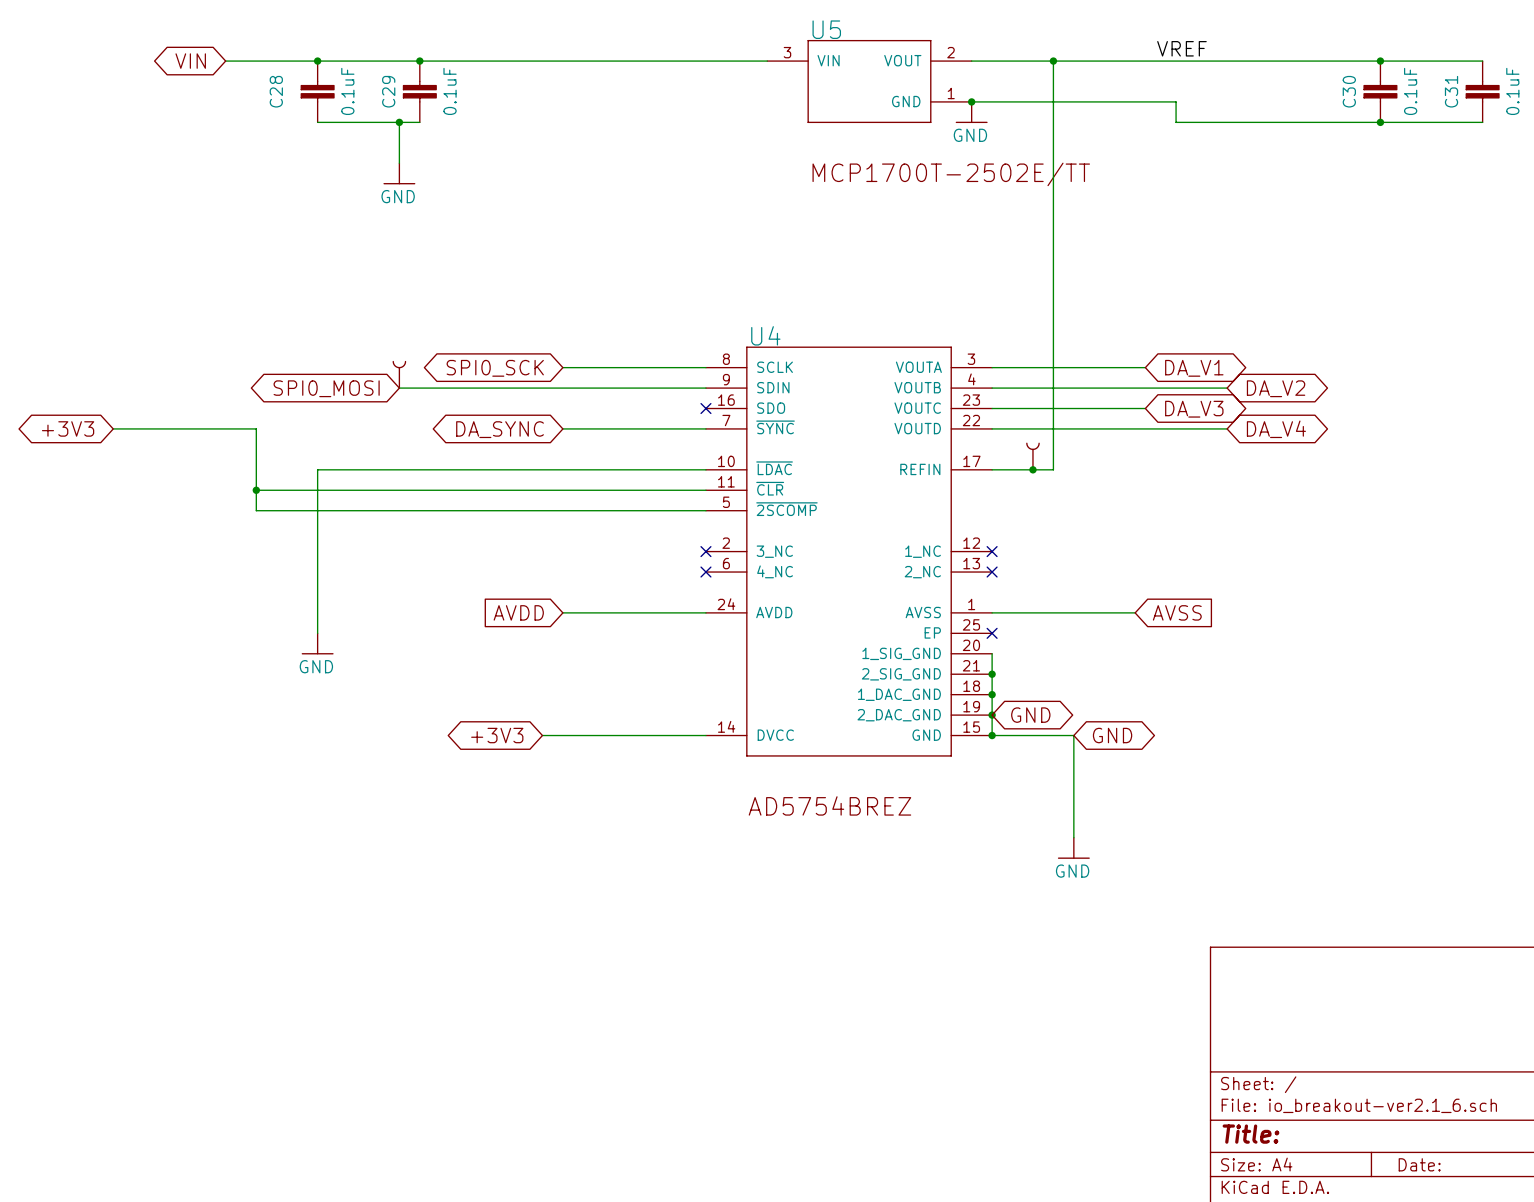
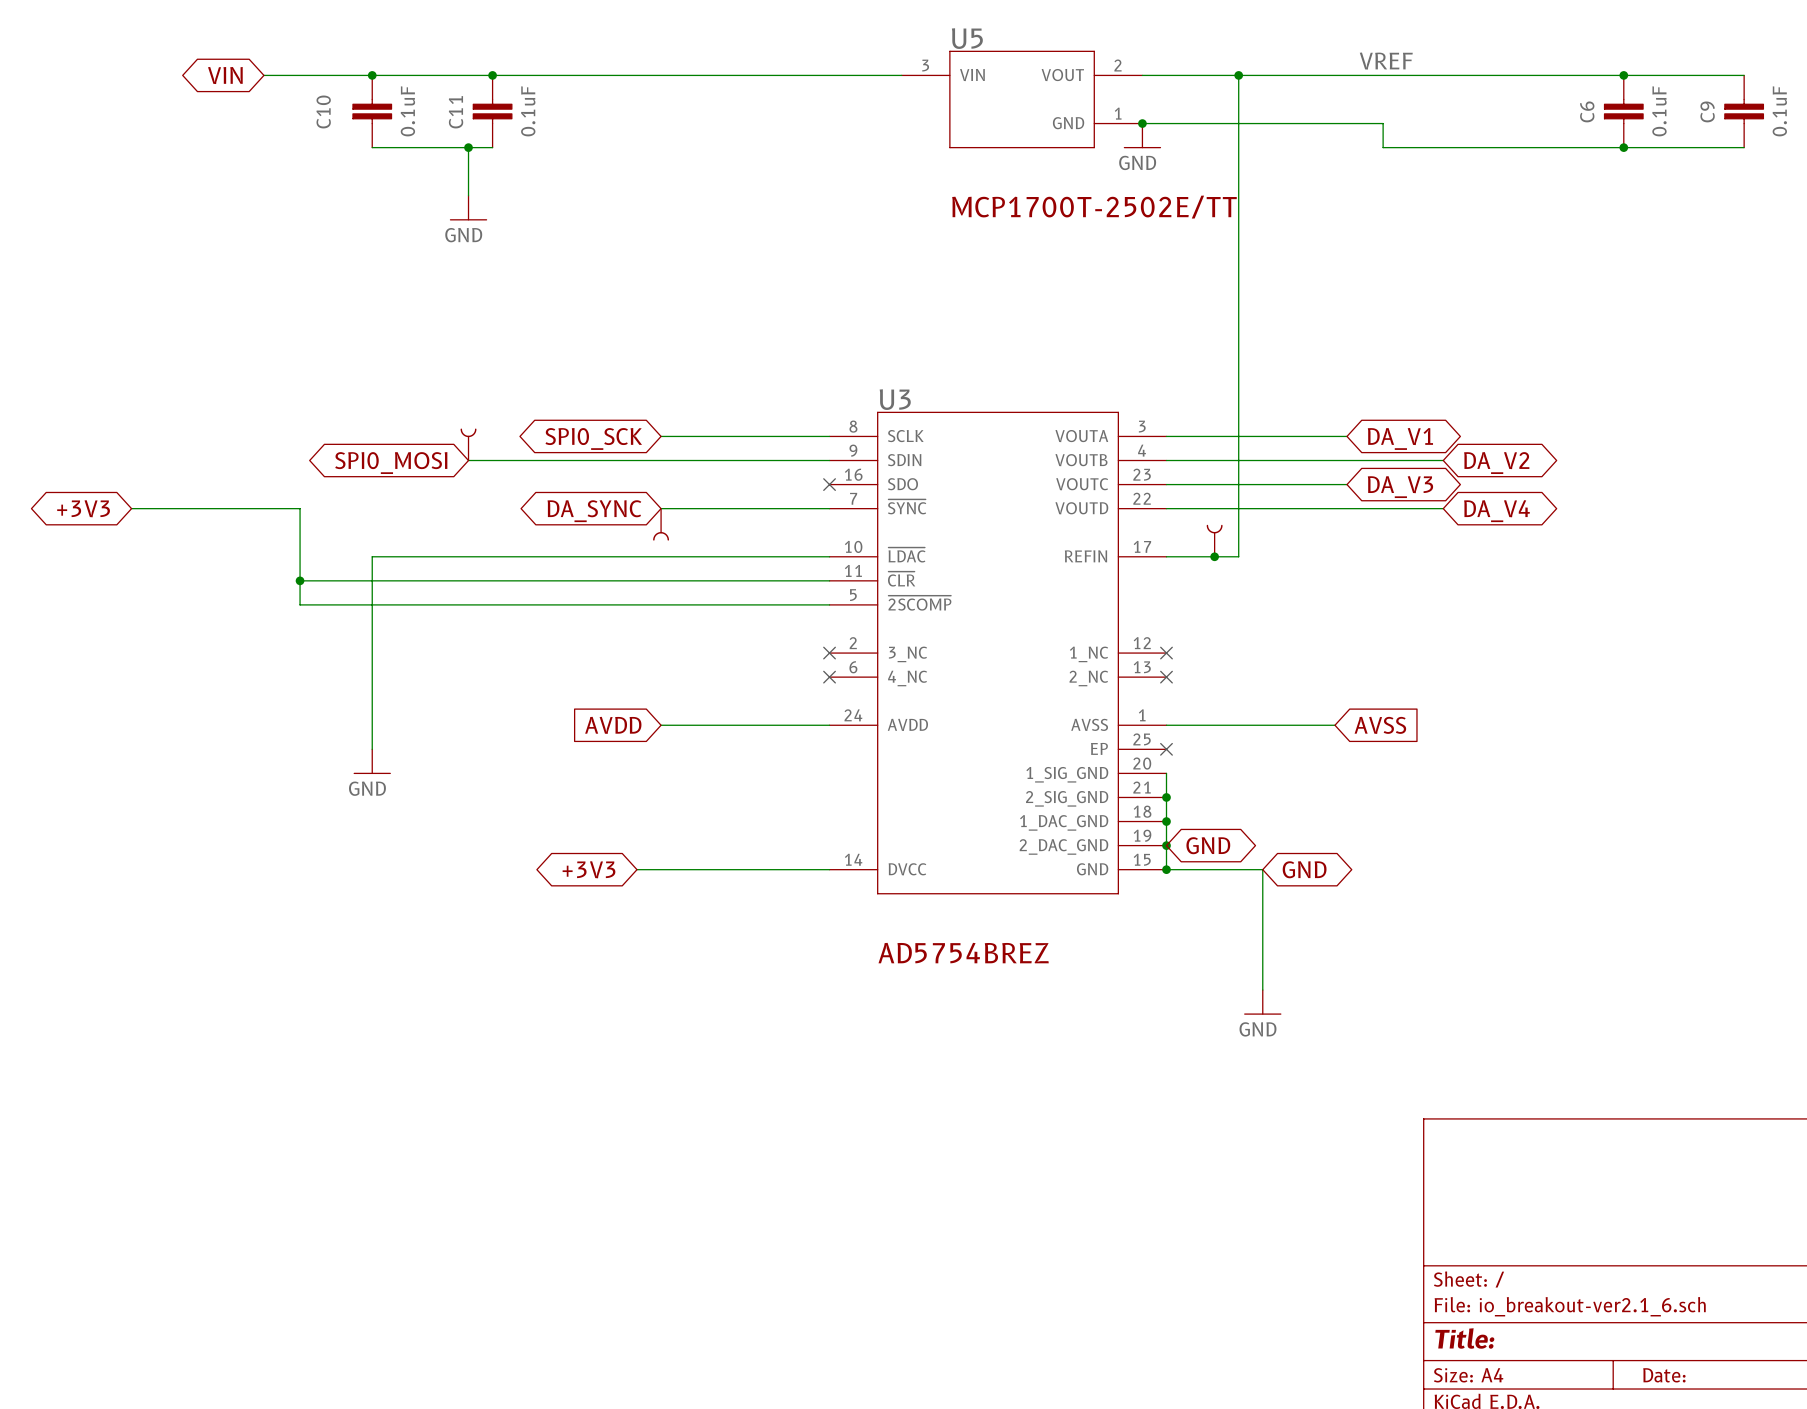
C28 name: C28 (276, 91) -> C10 (323, 111)
C29 name: C29 (388, 91) -> C11 (456, 112)
C30 name: C30 (1349, 91) -> C6 (1587, 111)
C31 name: C31 (1451, 91) -> C9 (1707, 111)
U4 name: U4 (765, 335) -> U3 (895, 399)
part: none -> (661, 524)

